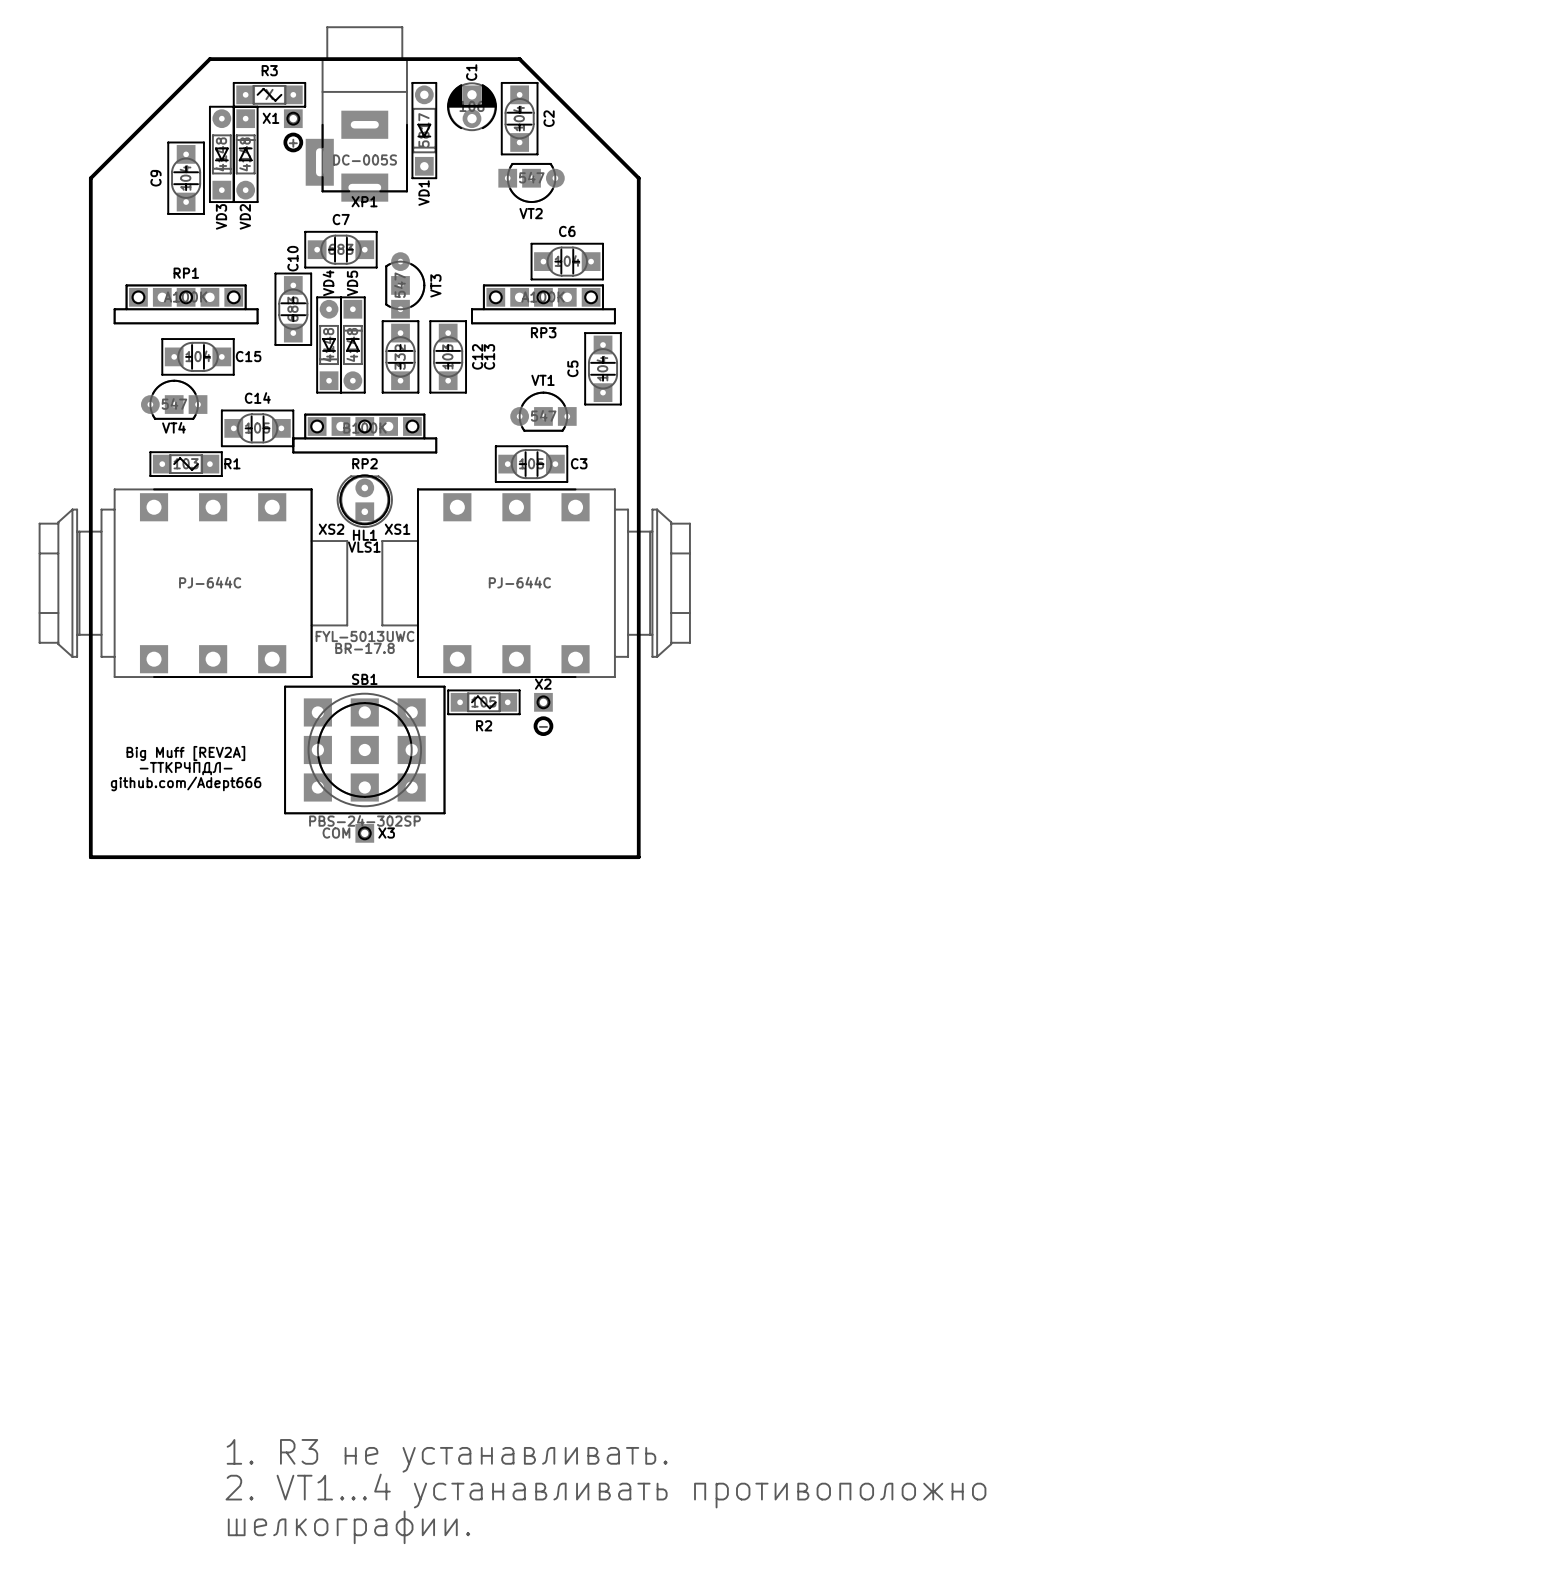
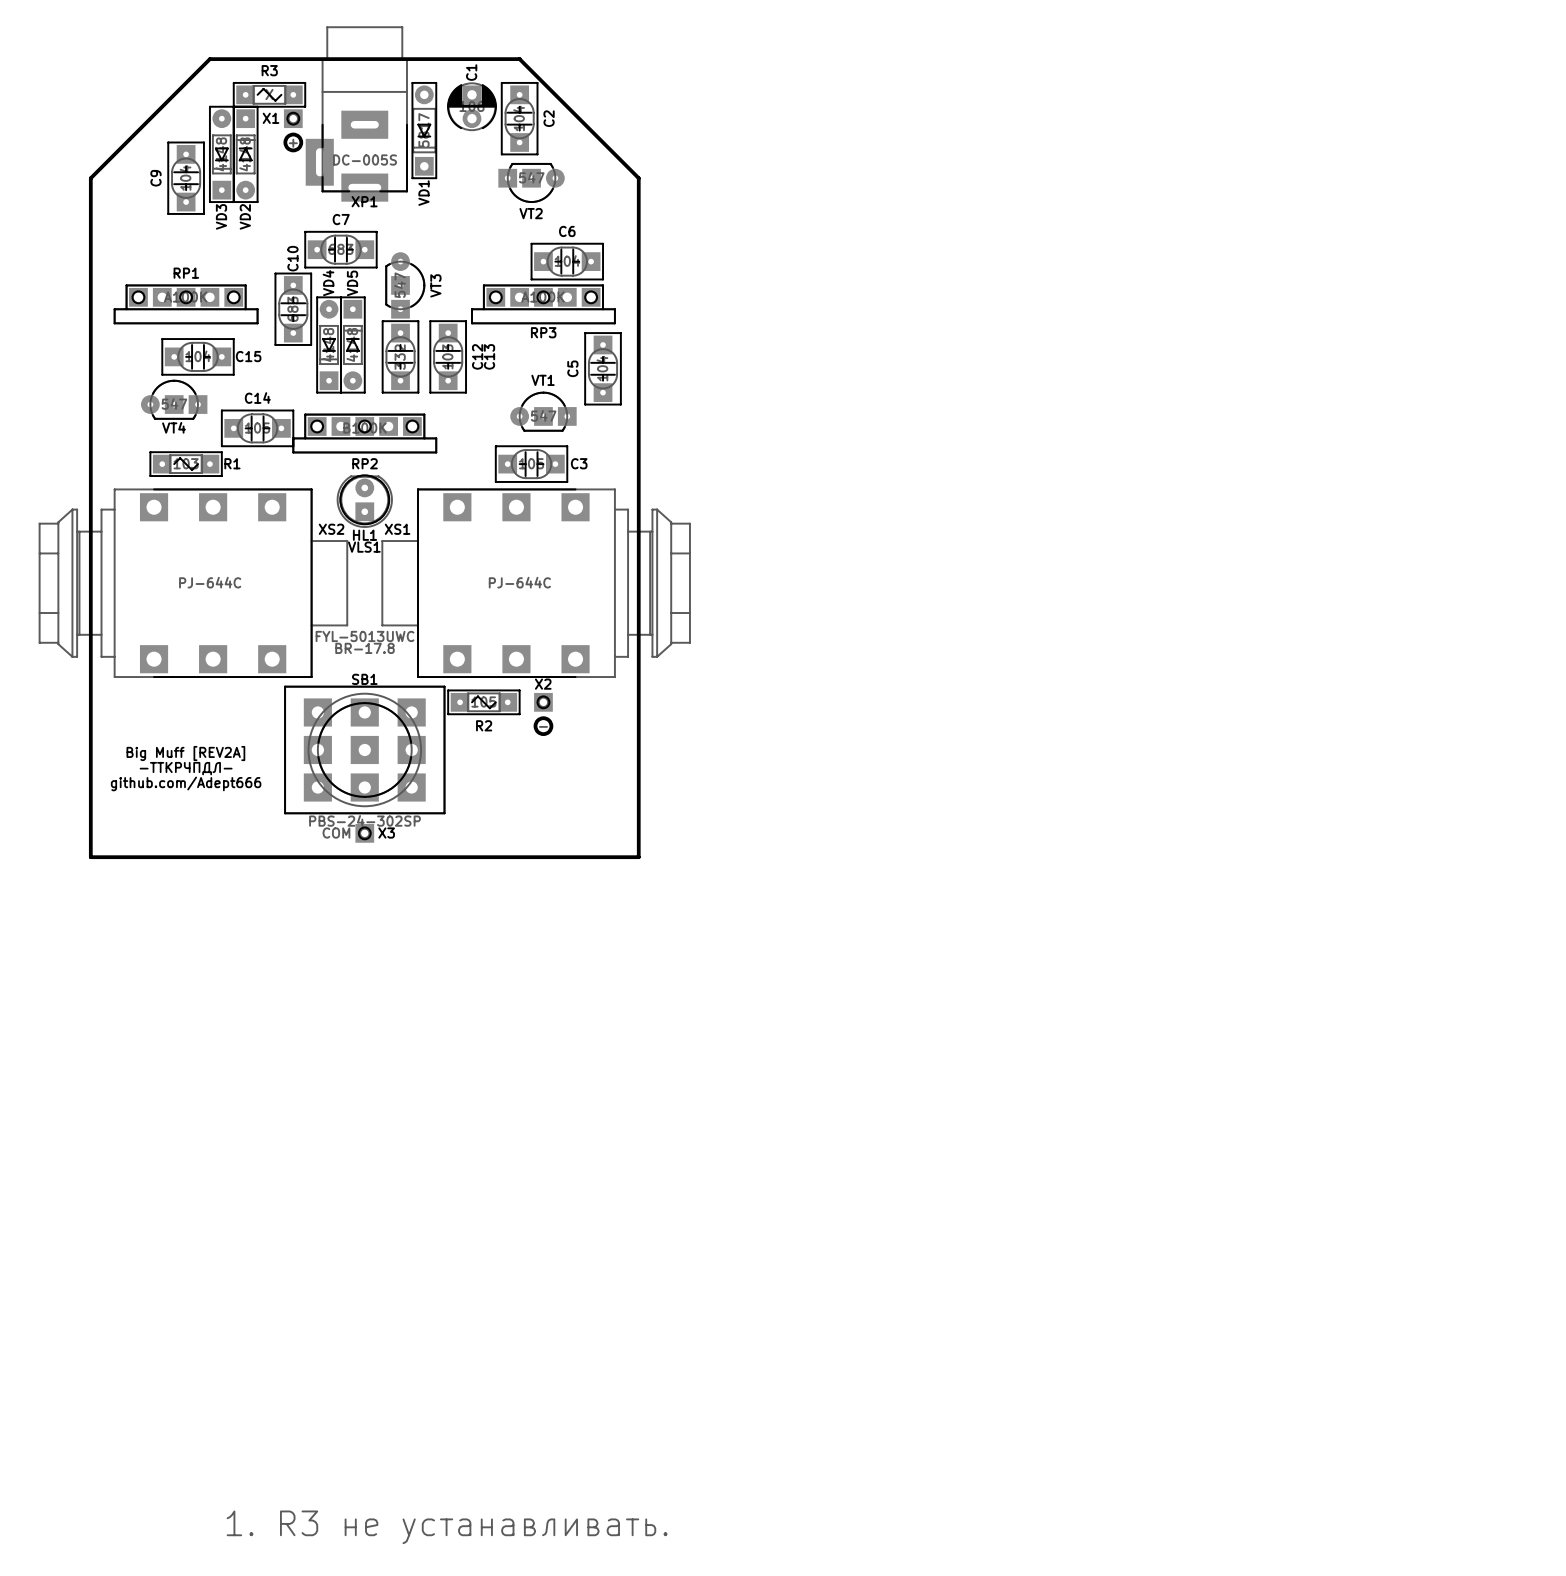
text: 1. R3 не устанавливать. (447, 1455) -> none
text: 2. VT1...4 устанавливать противоположно (605, 1491) -> none
text: шелкографии. (349, 1527) -> 1. R3 не устанавливать. (447, 1527)

